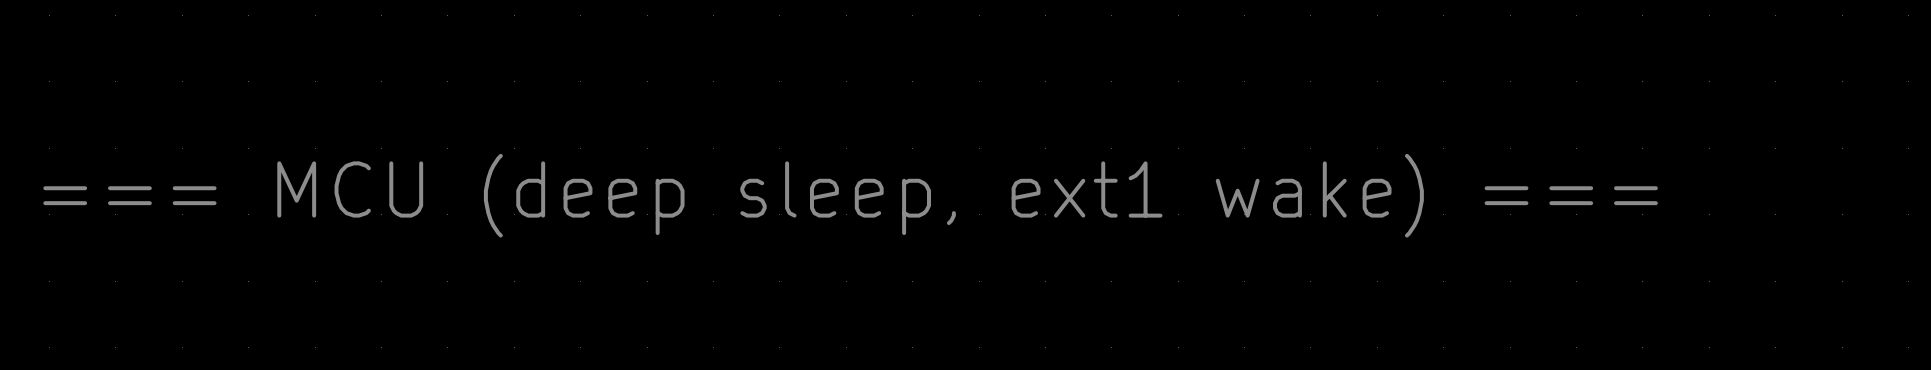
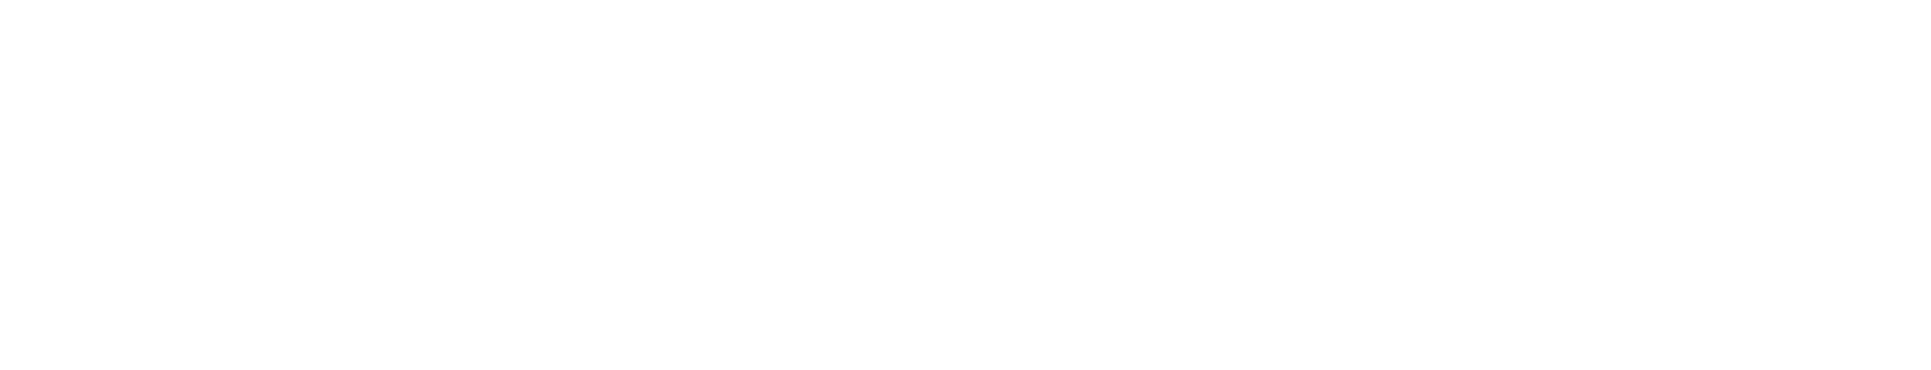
text: === MCU (deep sleep, ext1 wake) === (850, 195) -> none

